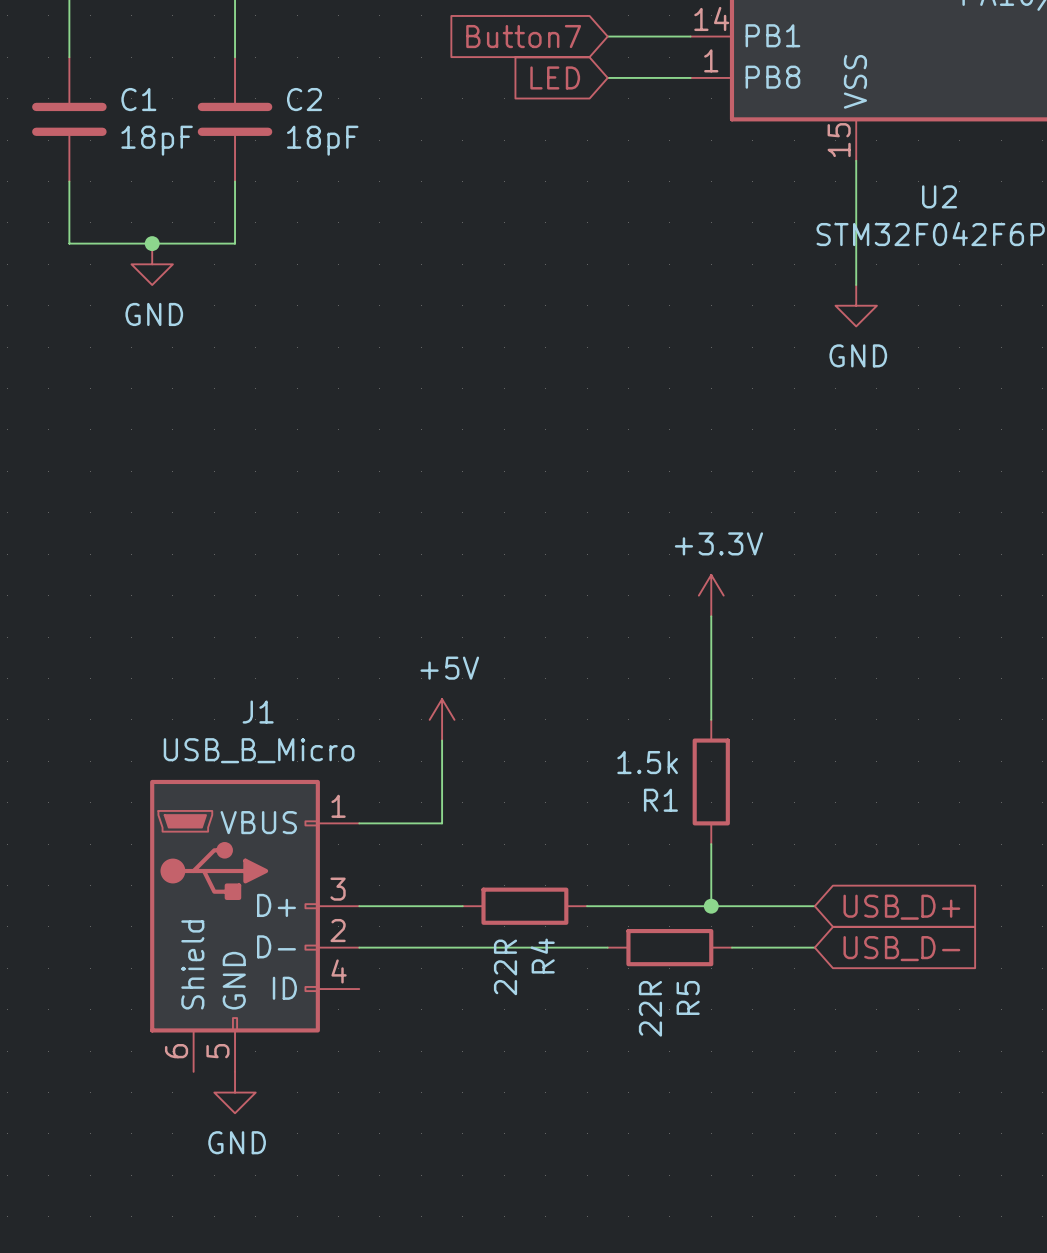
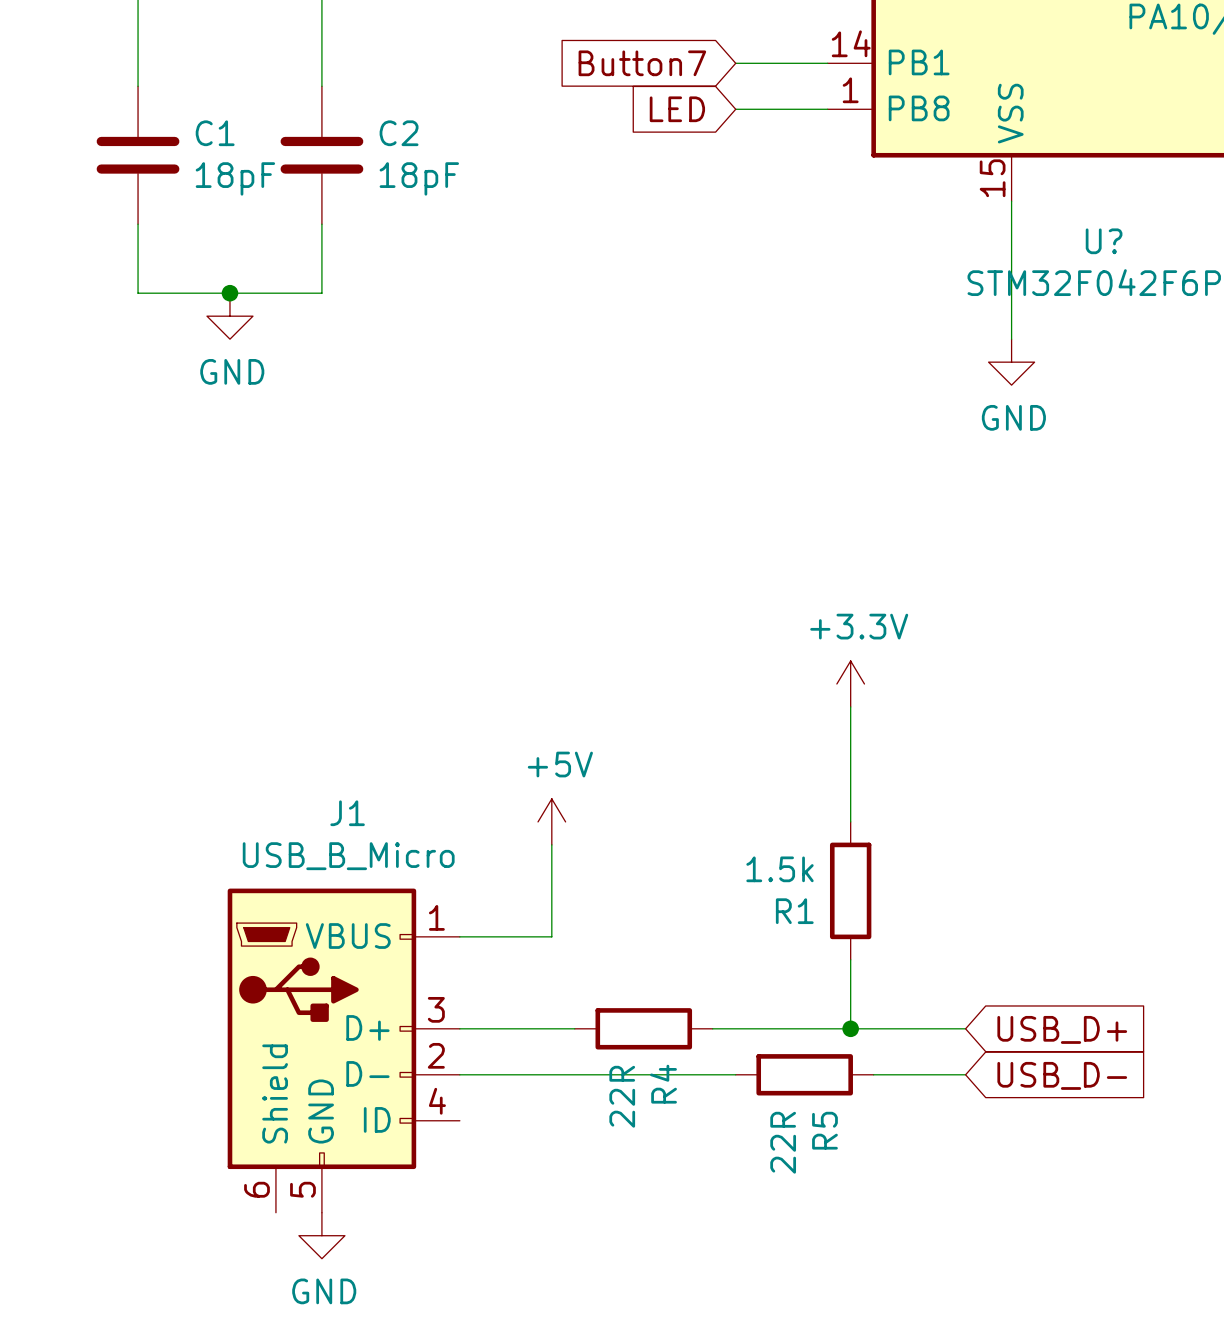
U2 name: U2 (939, 196) -> U? (1104, 241)

